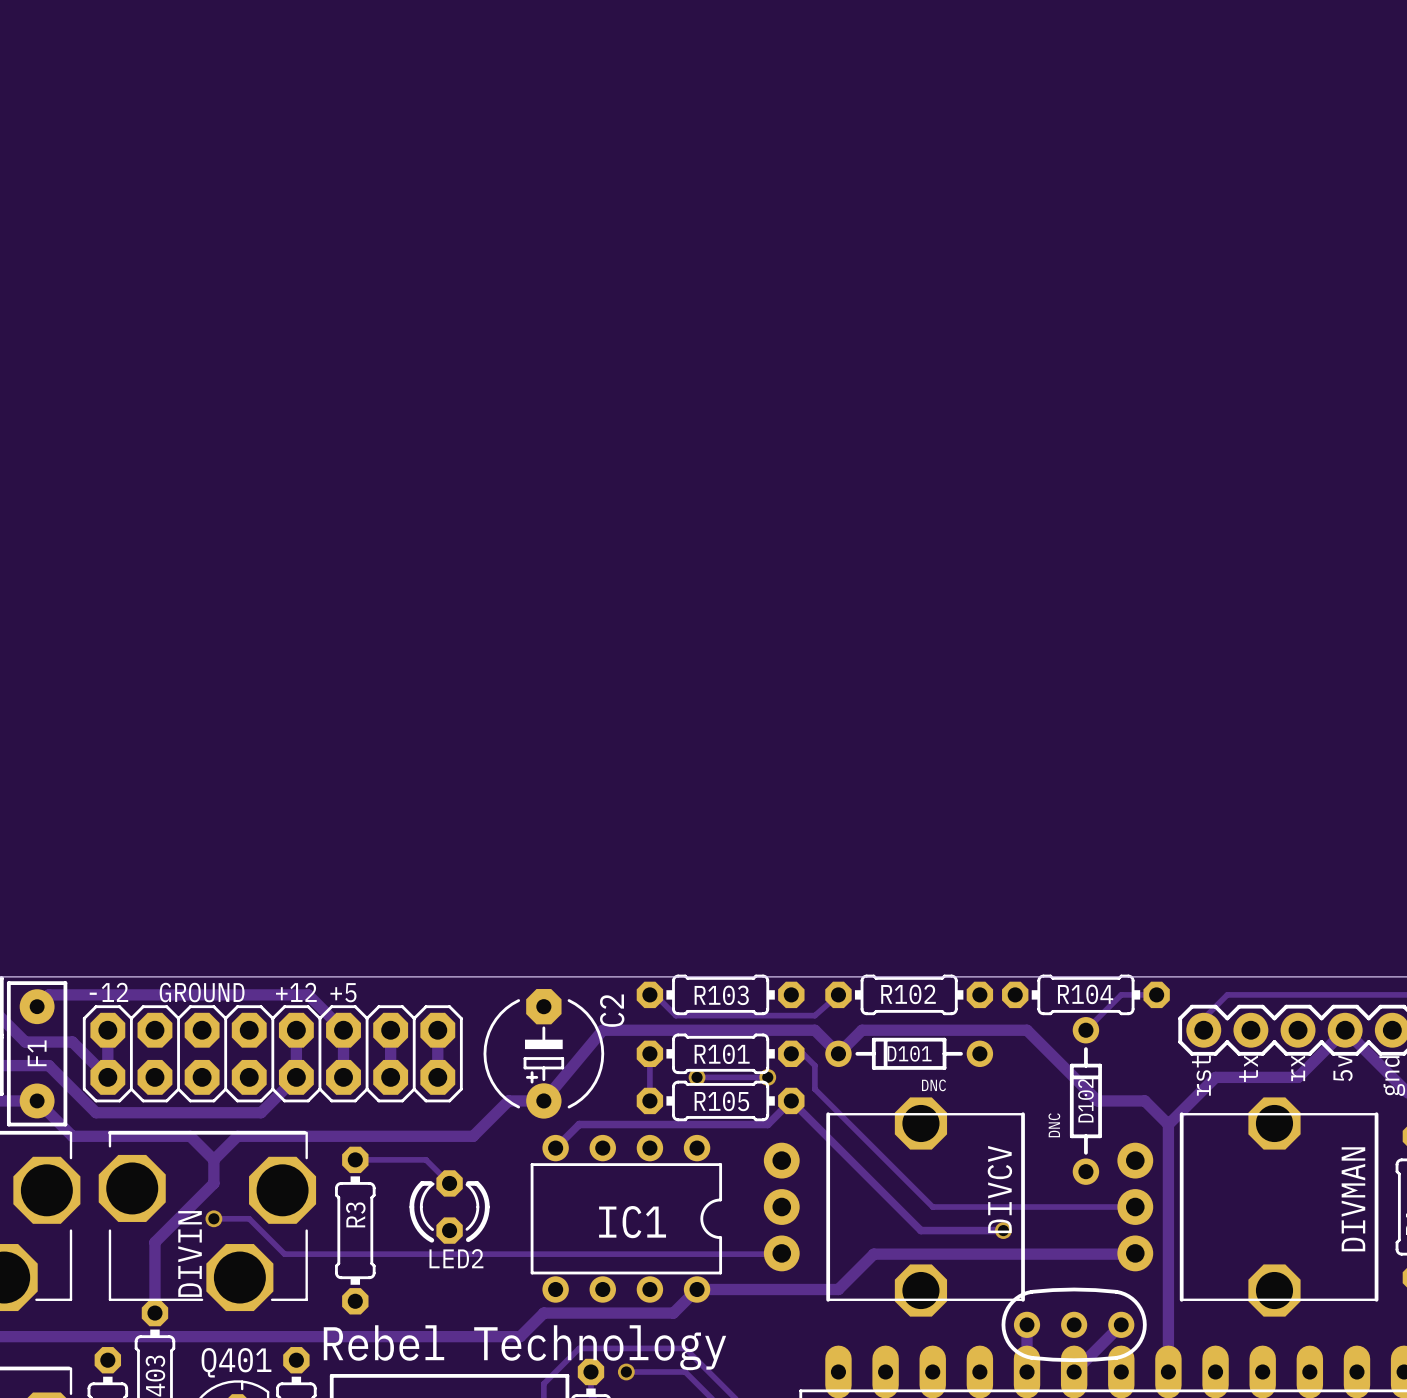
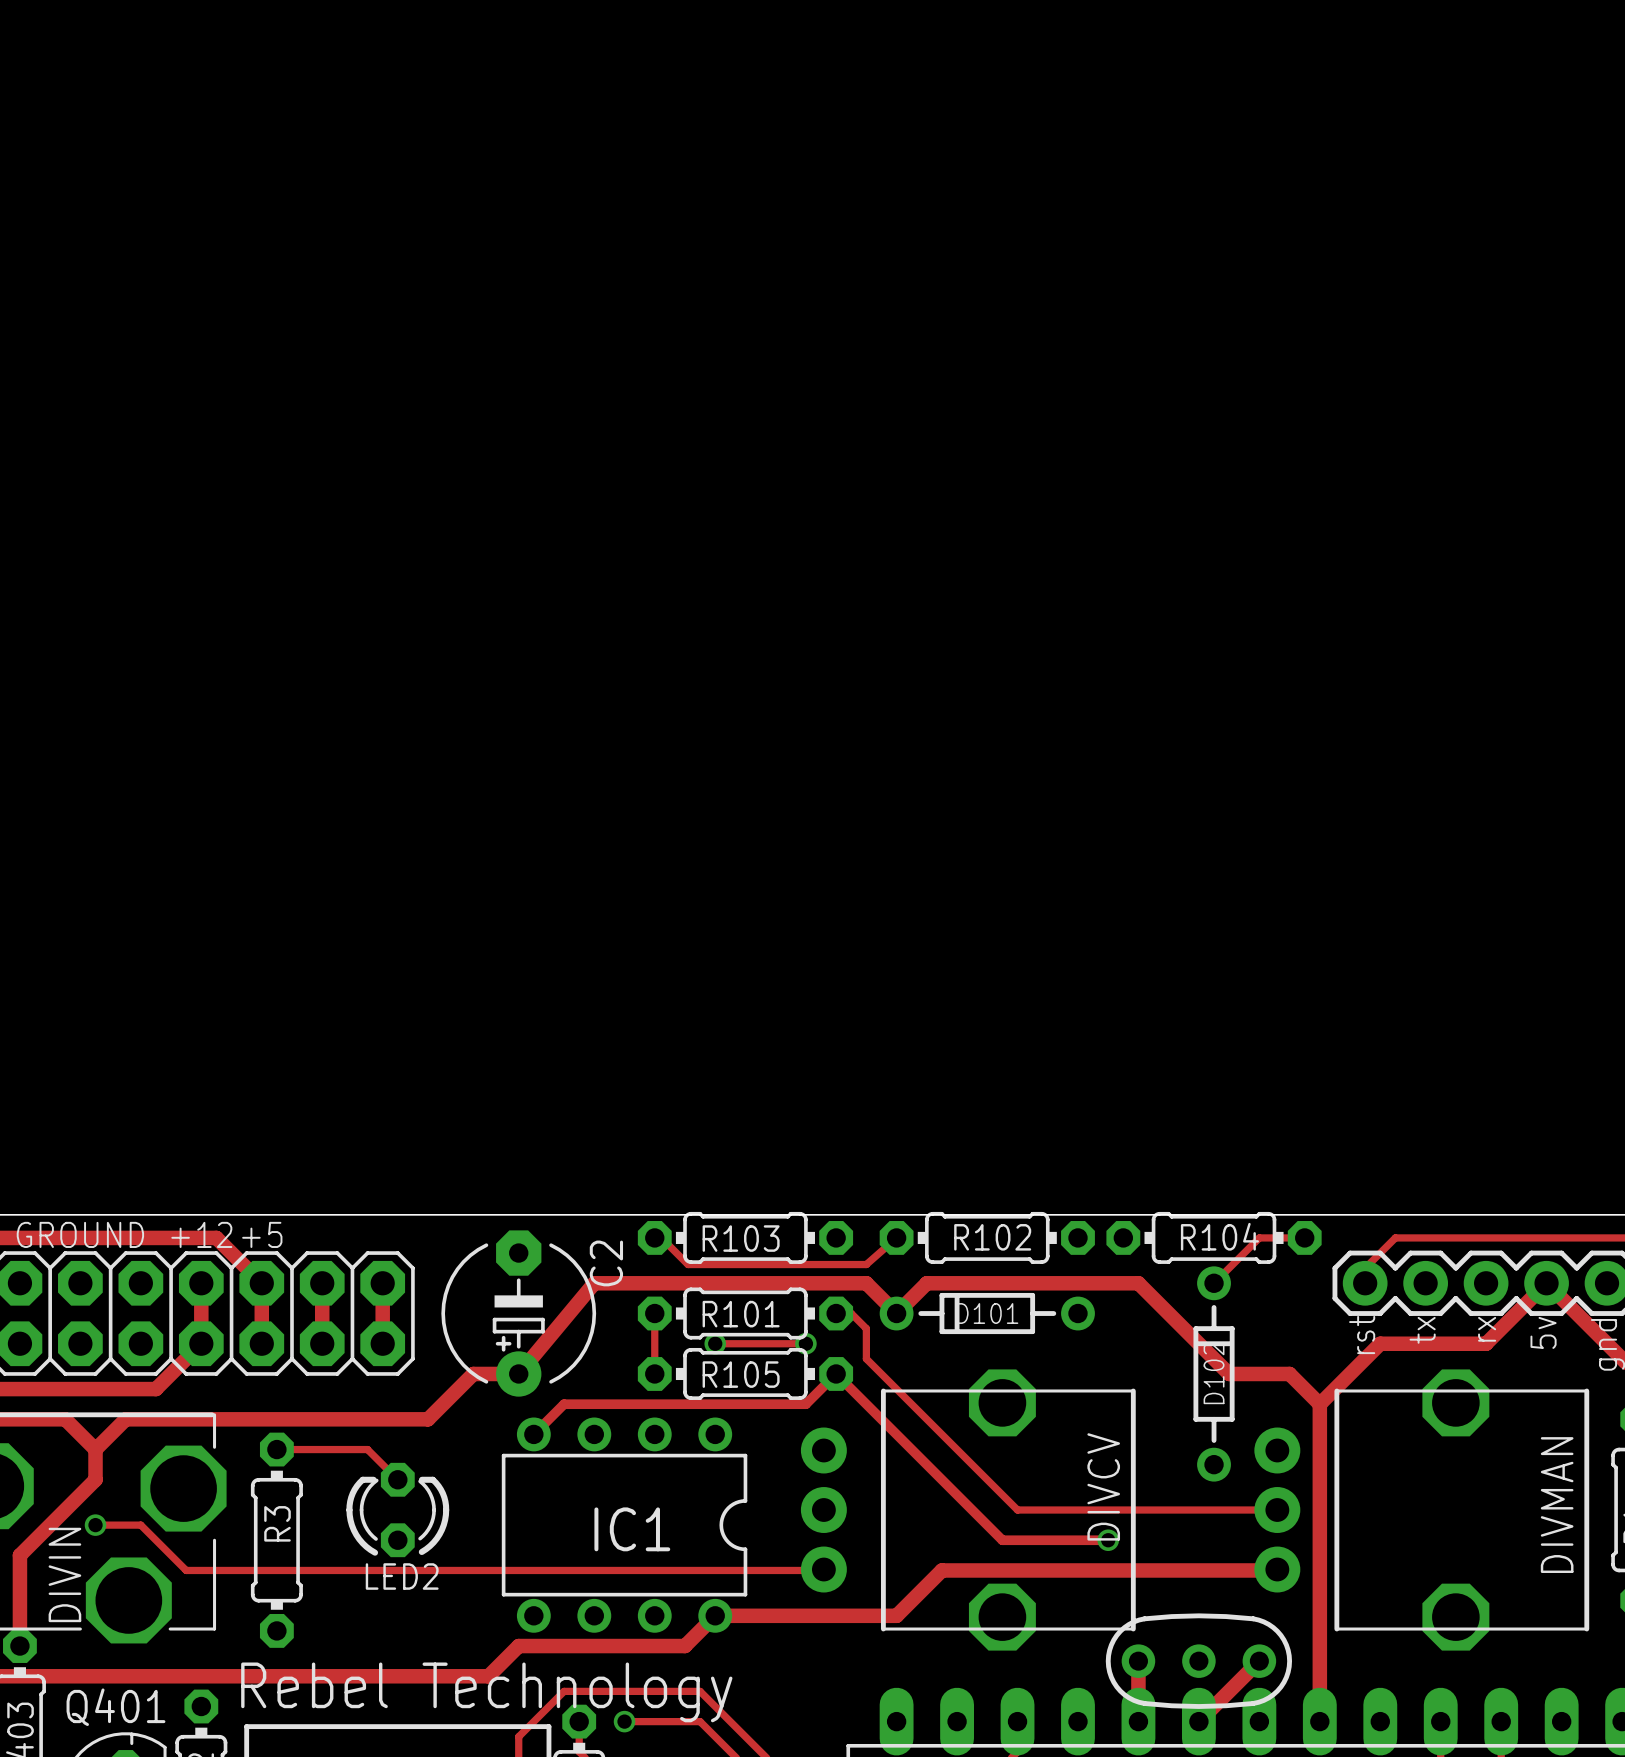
D101 value: DNC (933, 1085) -> none
D102 value: DNC (1054, 1125) -> none

